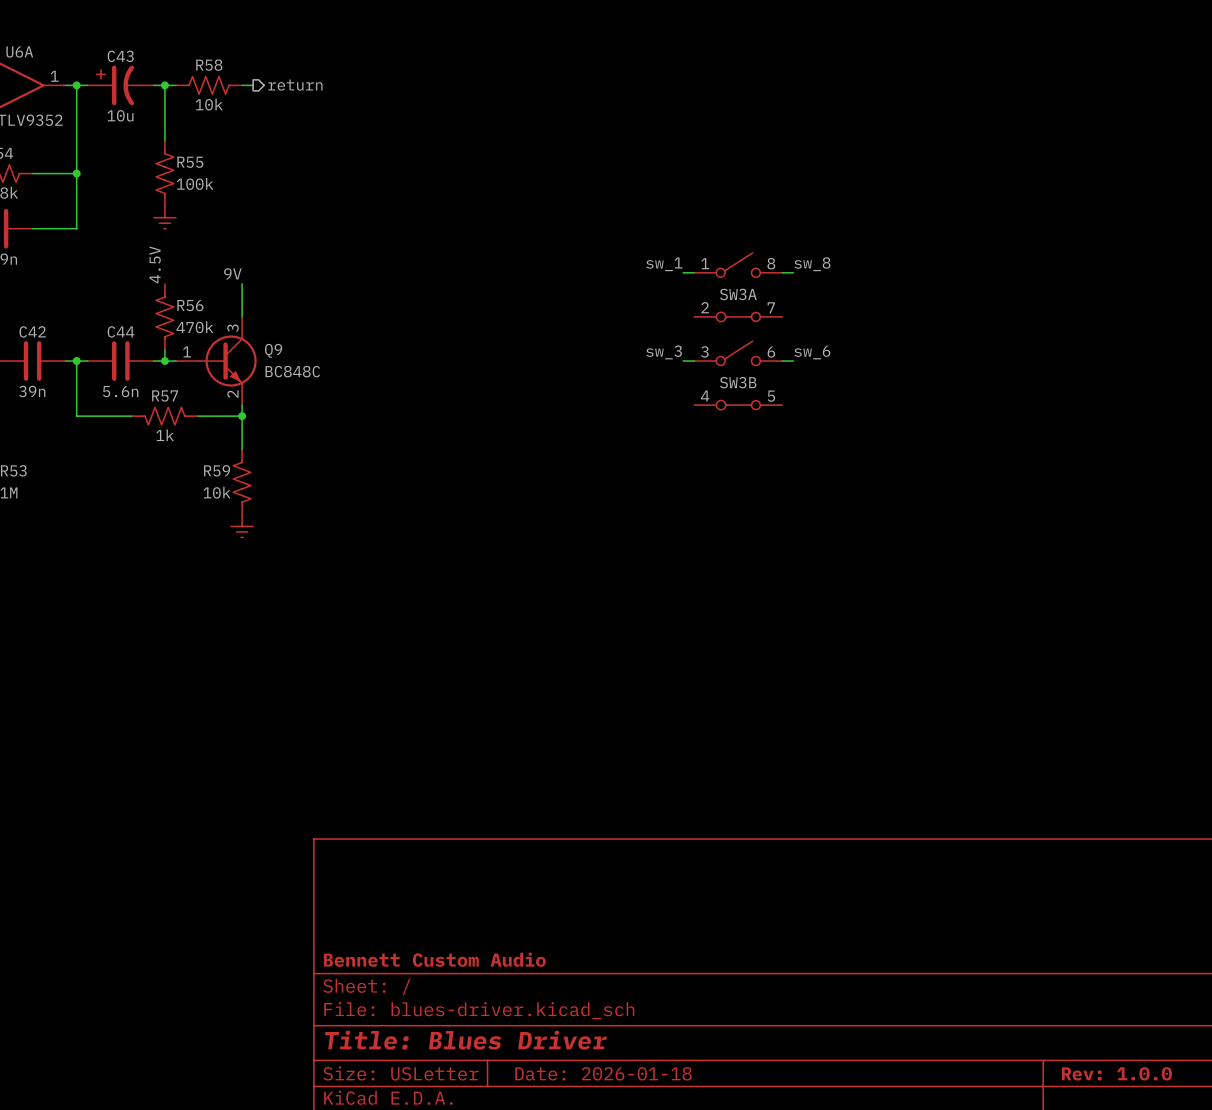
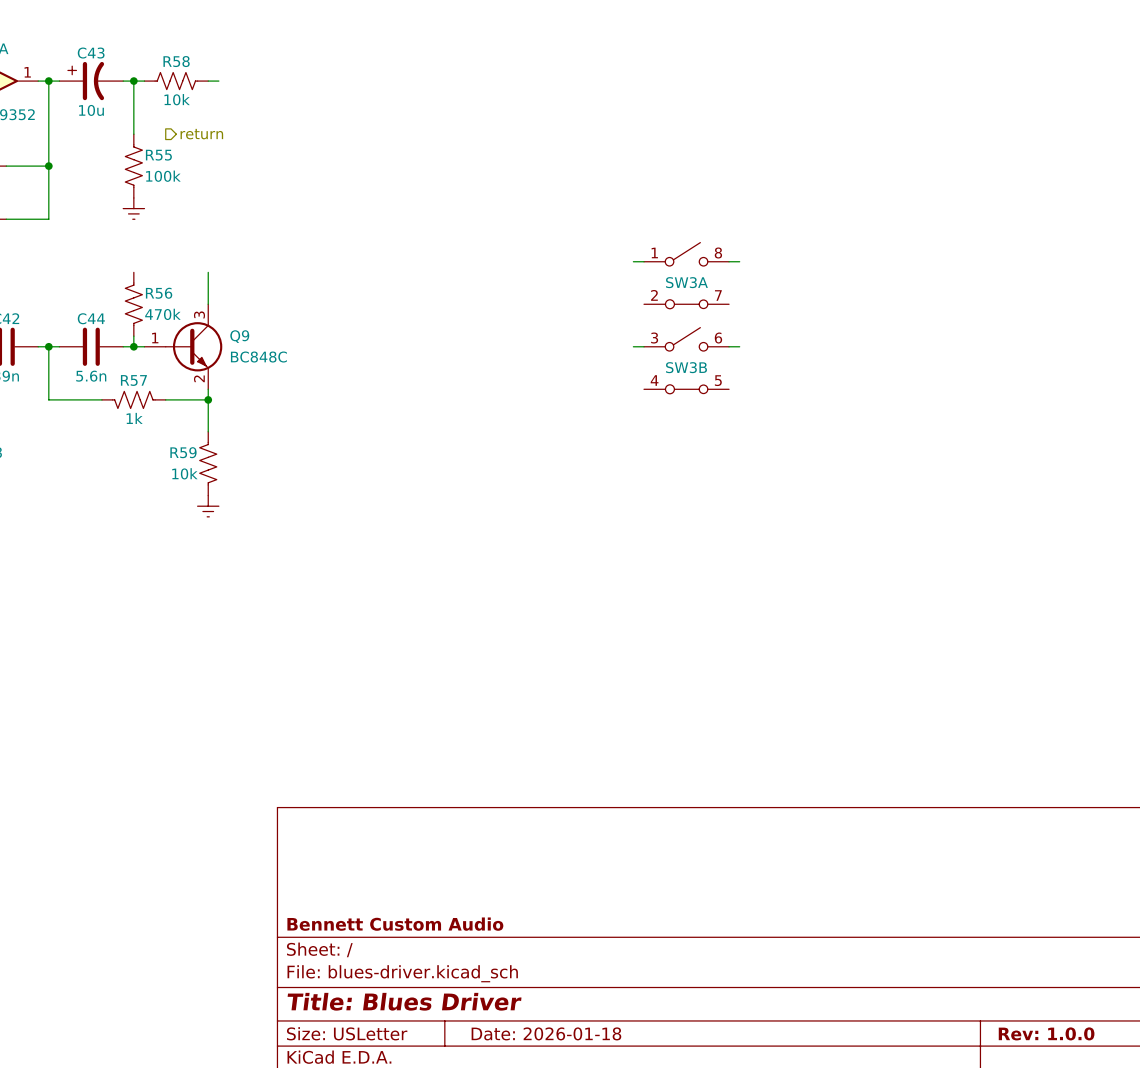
hierarchical label position: return (295, 85) -> return (201, 134)
label: 4.5V (155, 264) -> none
label: sw_1 (664, 264) -> none
label: sw_8 (812, 264) -> none
label: 9V (232, 273) -> none
label: sw_3 (664, 352) -> none
label: sw_6 (812, 352) -> none

